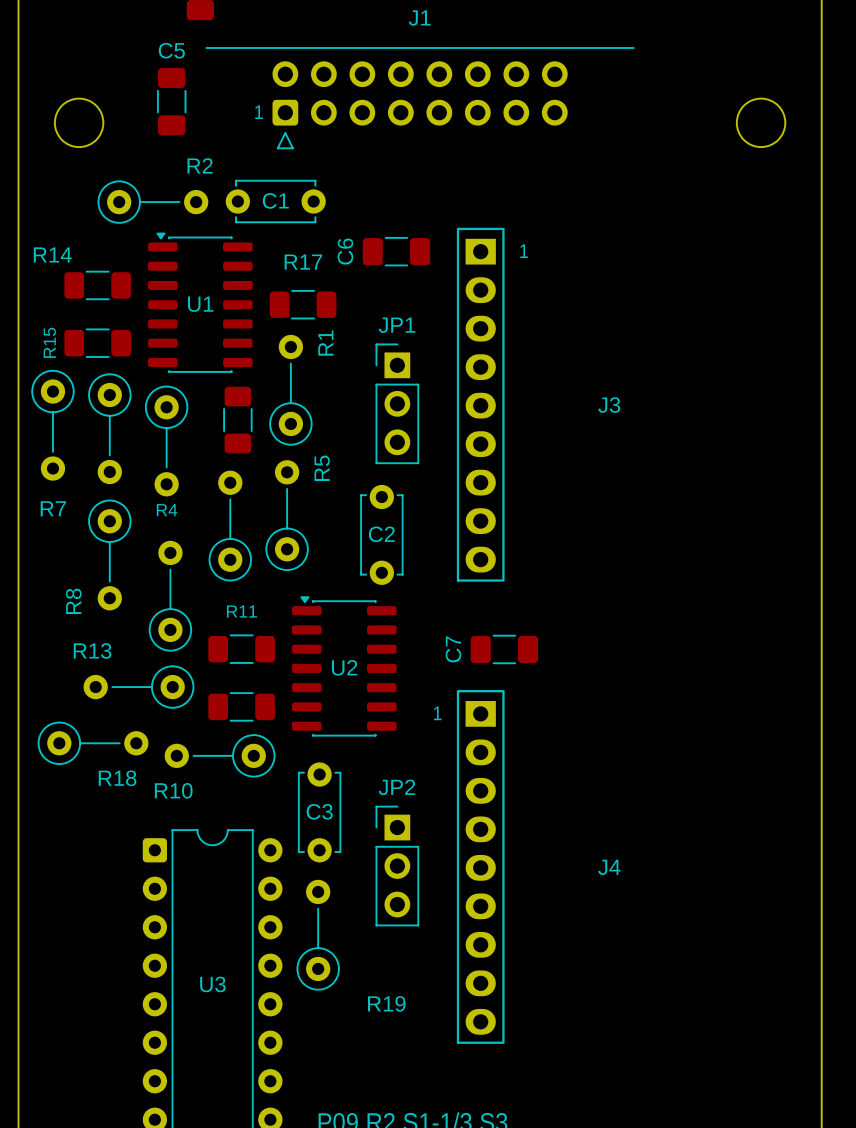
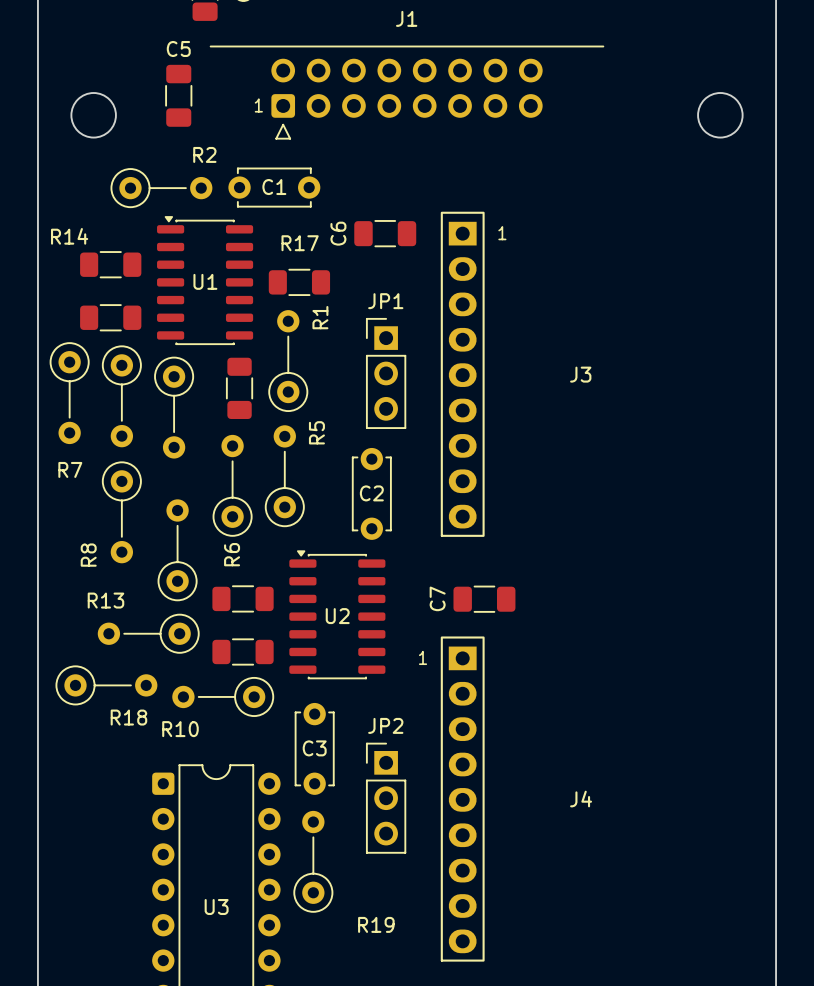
R15 name: R15 (49, 342) -> none
R4 name: R4 (167, 510) -> none
R6 name: none -> R6 (232, 554)
R11 name: R11 (241, 611) -> none

